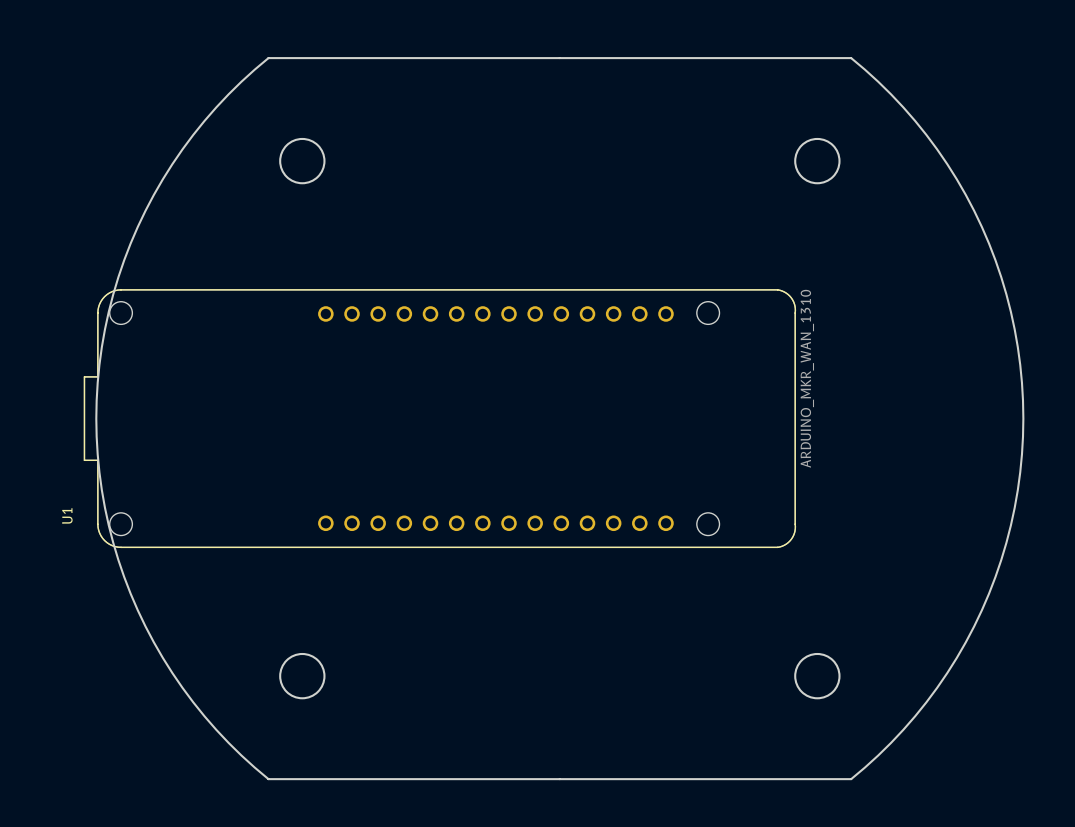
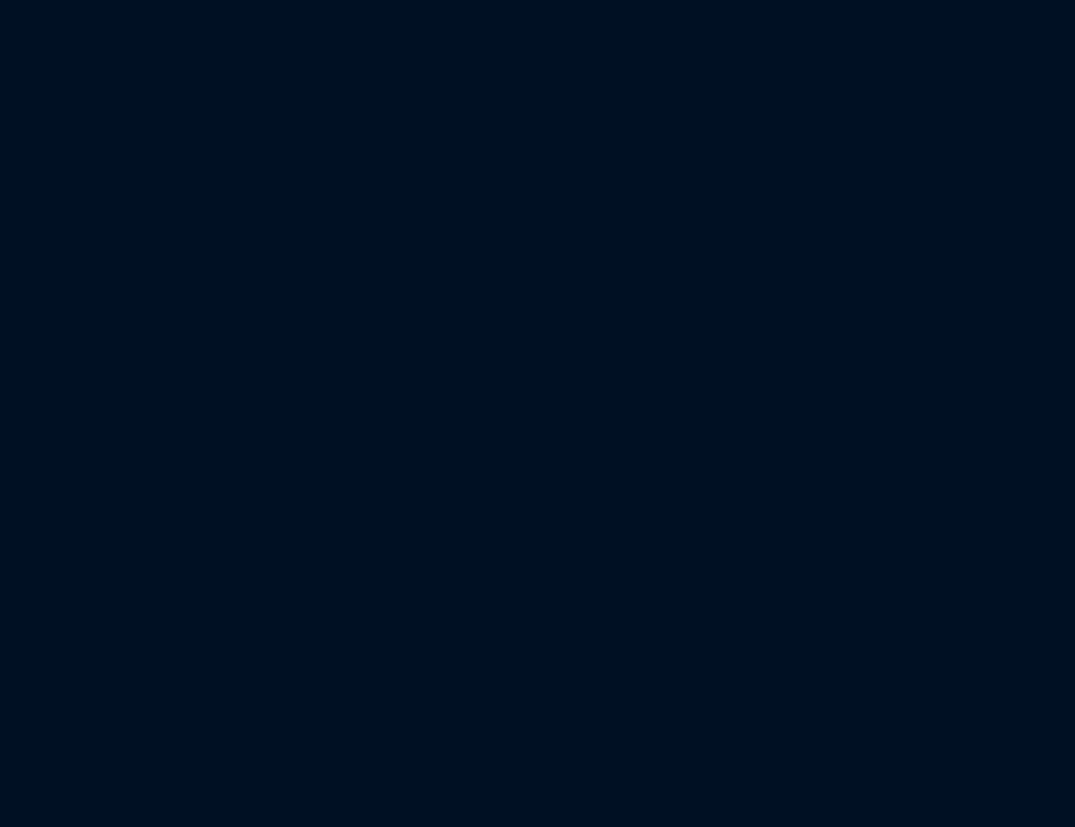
board edge: (268, 58) (851, 58) (878, 81) (915, 120) (937, 149) (965, 194) (989, 243) (1006, 294) (1014, 329) (1021, 382) (1023, 436) (1020, 472) (1014, 507) (1001, 560) (989, 593) (965, 642) (937, 687) (915, 716) (891, 742) (851, 779) (268, 779) (228, 742) (204, 716) (172, 673) (153, 642) (130, 593) (118, 560) (104, 507) (99, 472) (96, 436) (97, 382) (104, 329) (118, 277) (130, 243) (153, 194) (182, 149) (204, 120) (228, 94) (268, 58) -> none
round board edge: [279, 137, 326, 185] -> none
round board edge: [794, 137, 841, 185] -> none
U1: ARDUINO_MKR_WAN_1310 (439, 418) -> none
round board edge: [279, 652, 326, 700] -> none
round board edge: [794, 652, 841, 700] -> none

